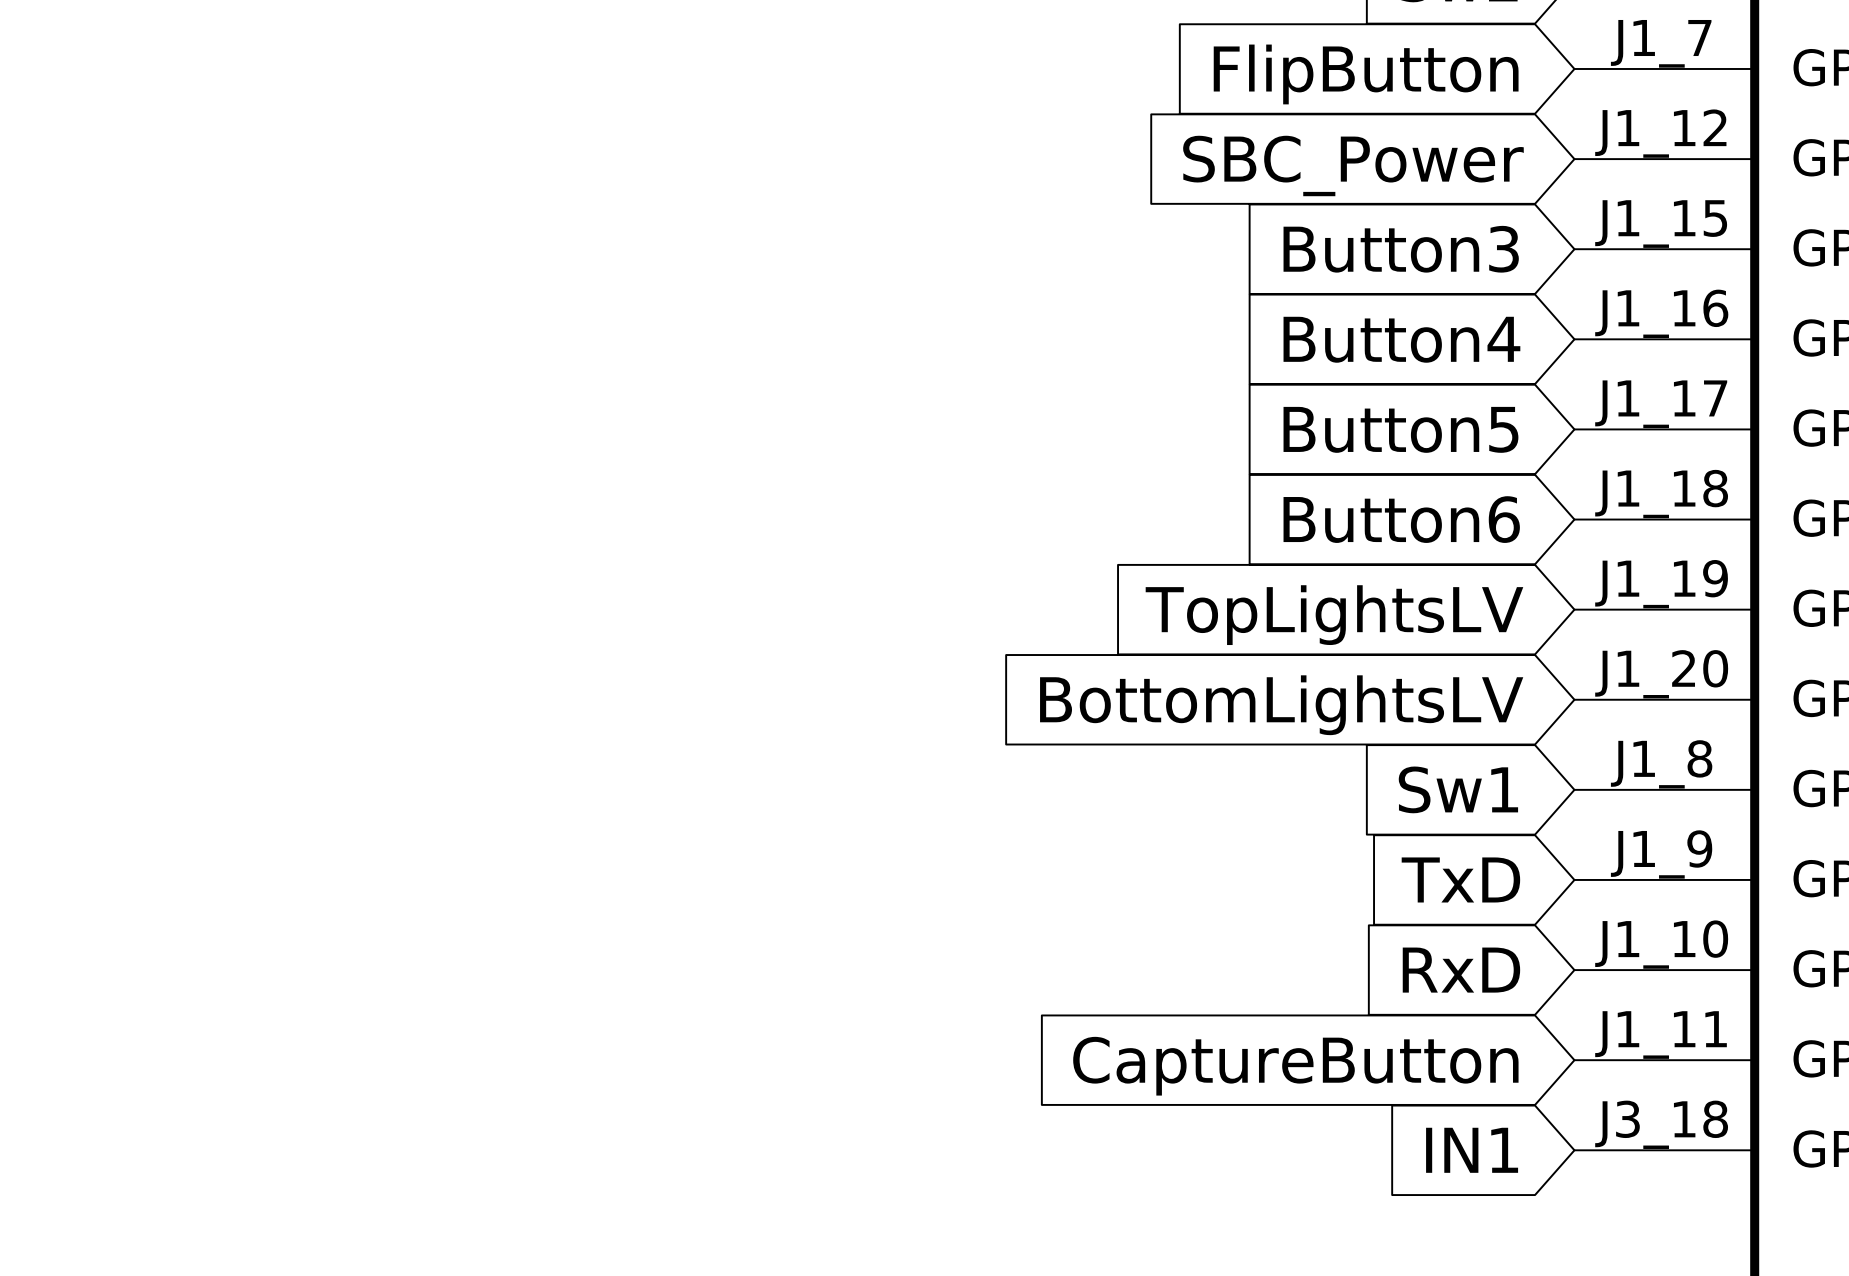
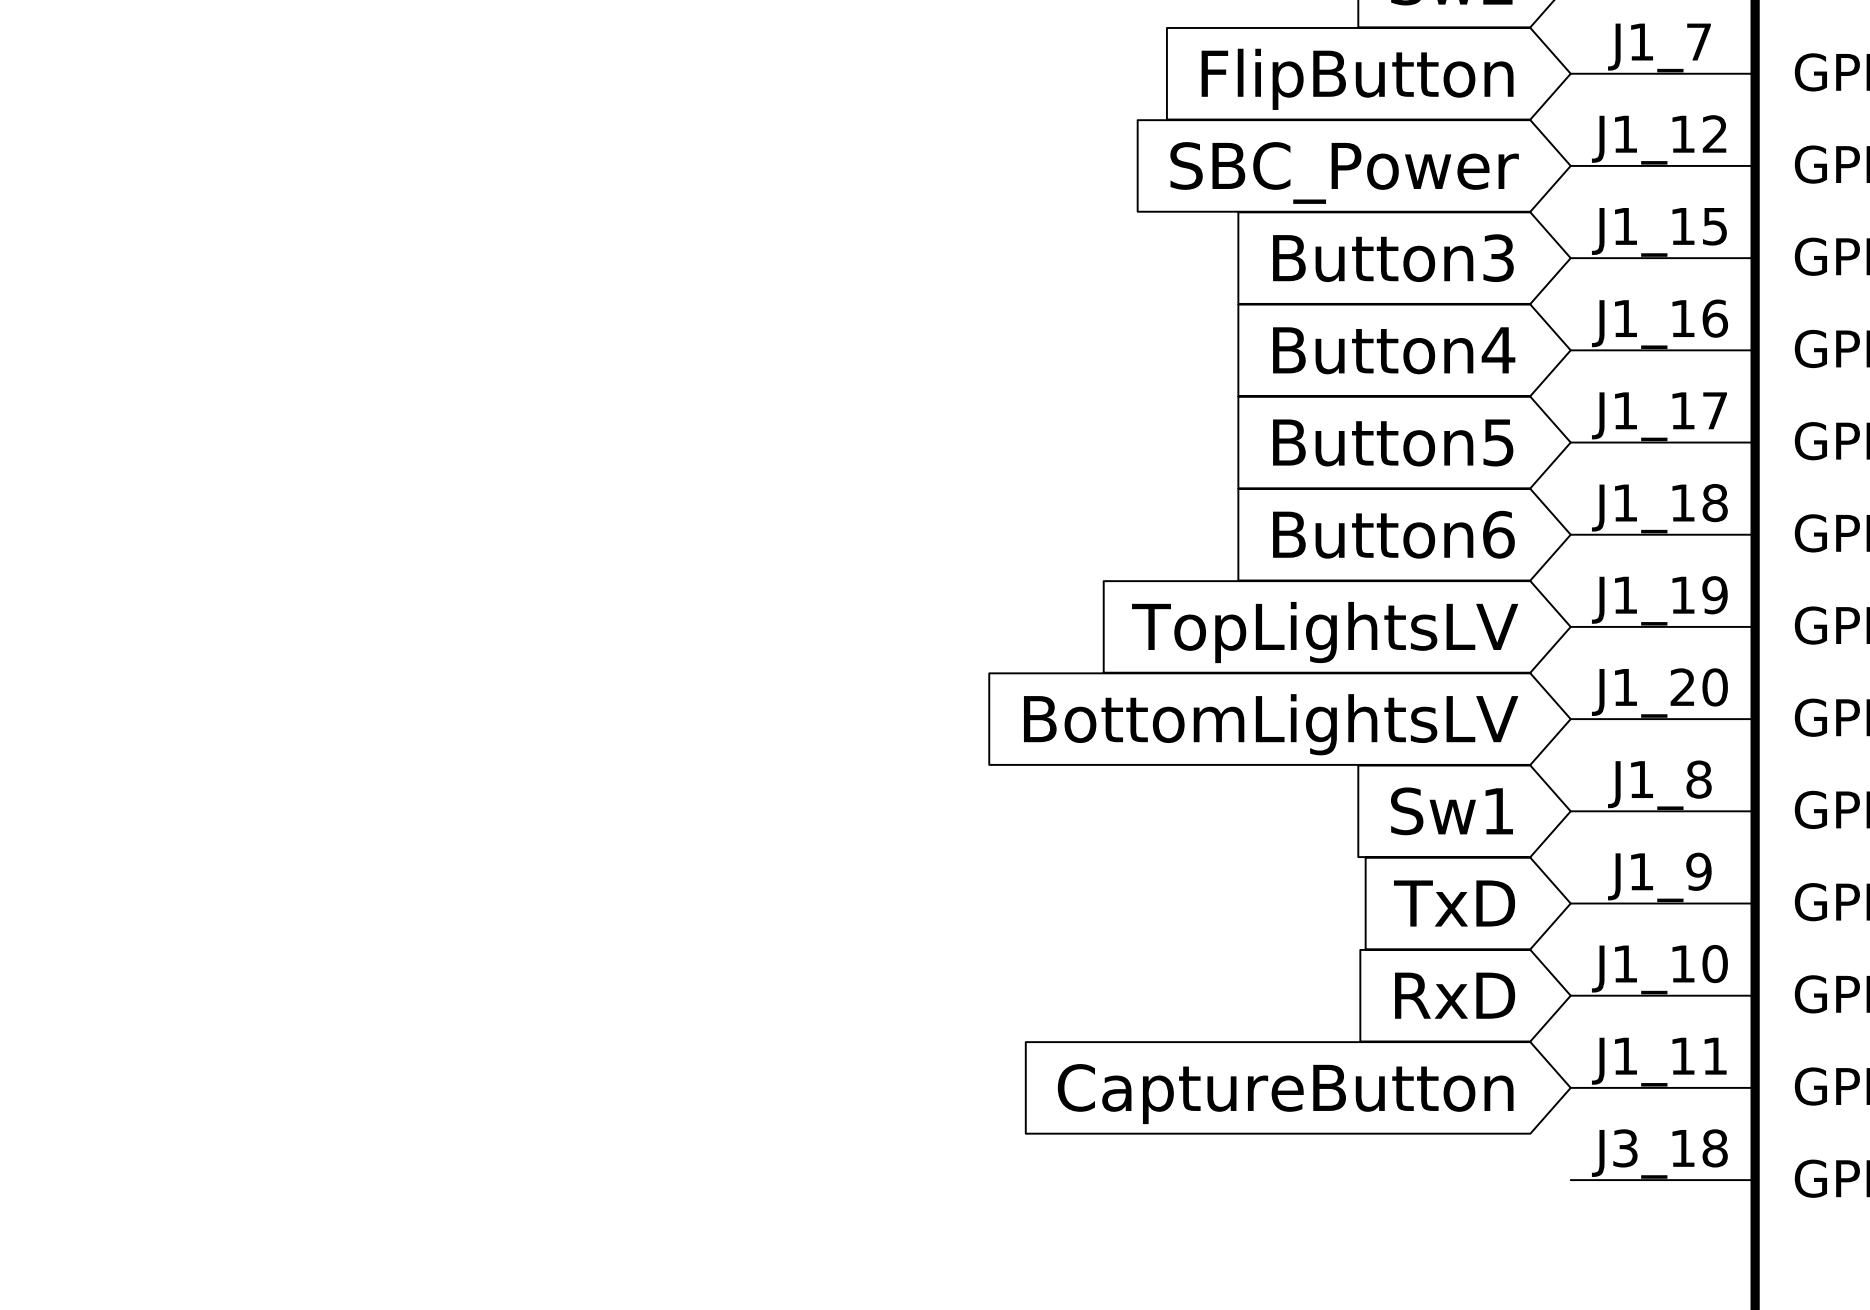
global label: IN1 (1472, 1150) -> none

